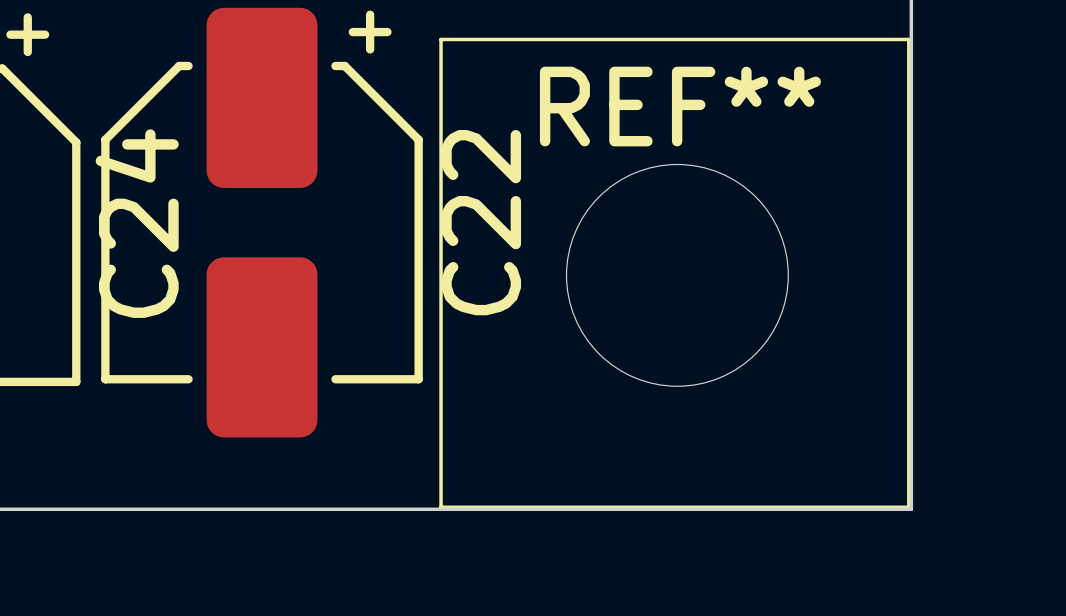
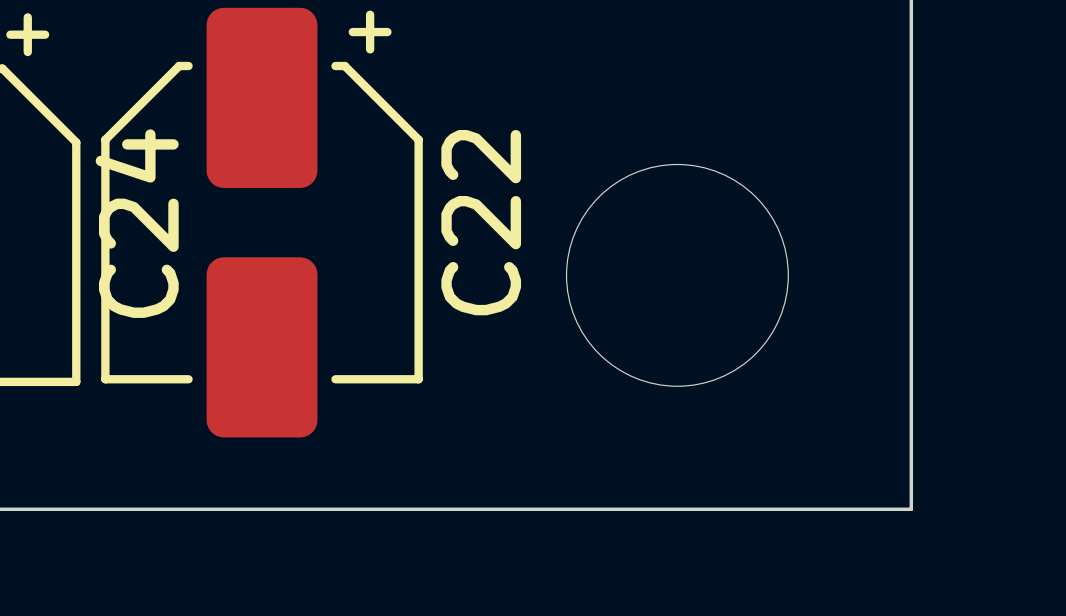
line: (441, 39) (908, 39) (908, 507) (441, 507) (441, 39) -> none
REF** name: REF** (680, 106) -> none

